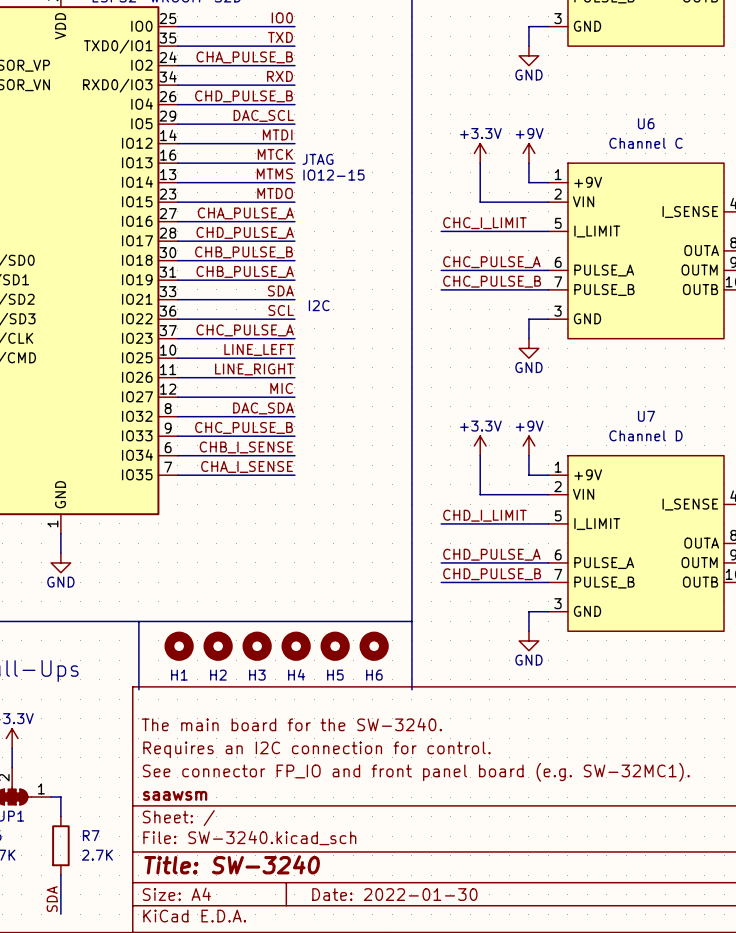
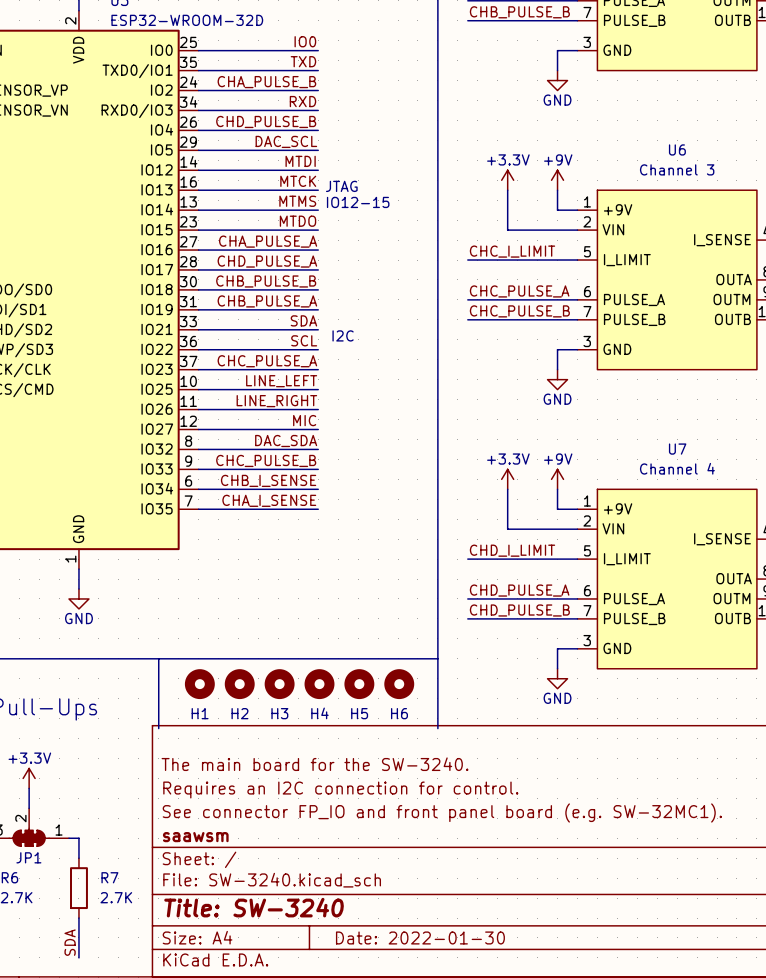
U6 value: Channel C (645, 143) -> Channel 3 (677, 169)
U7 value: Channel D (645, 435) -> Channel 4 (677, 468)

